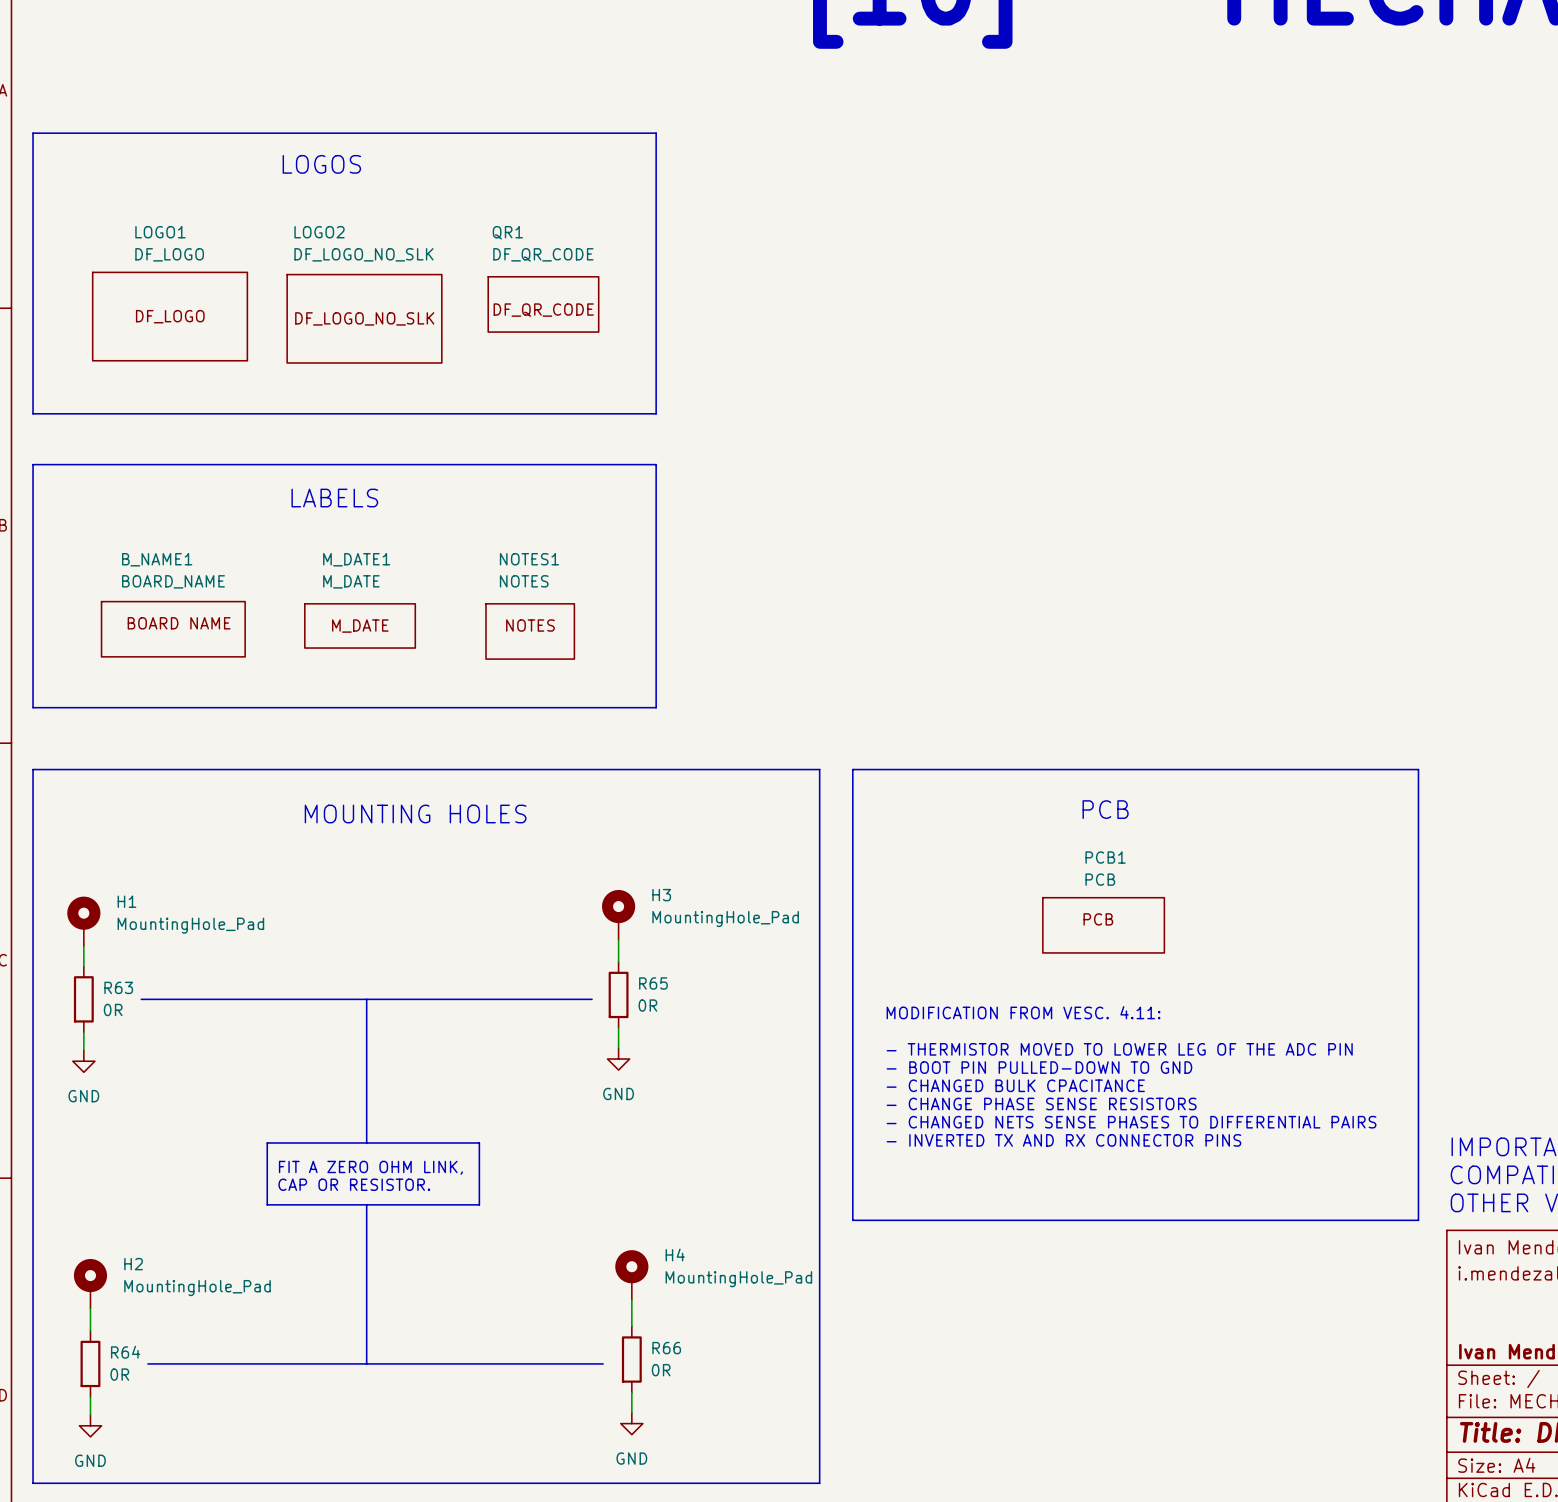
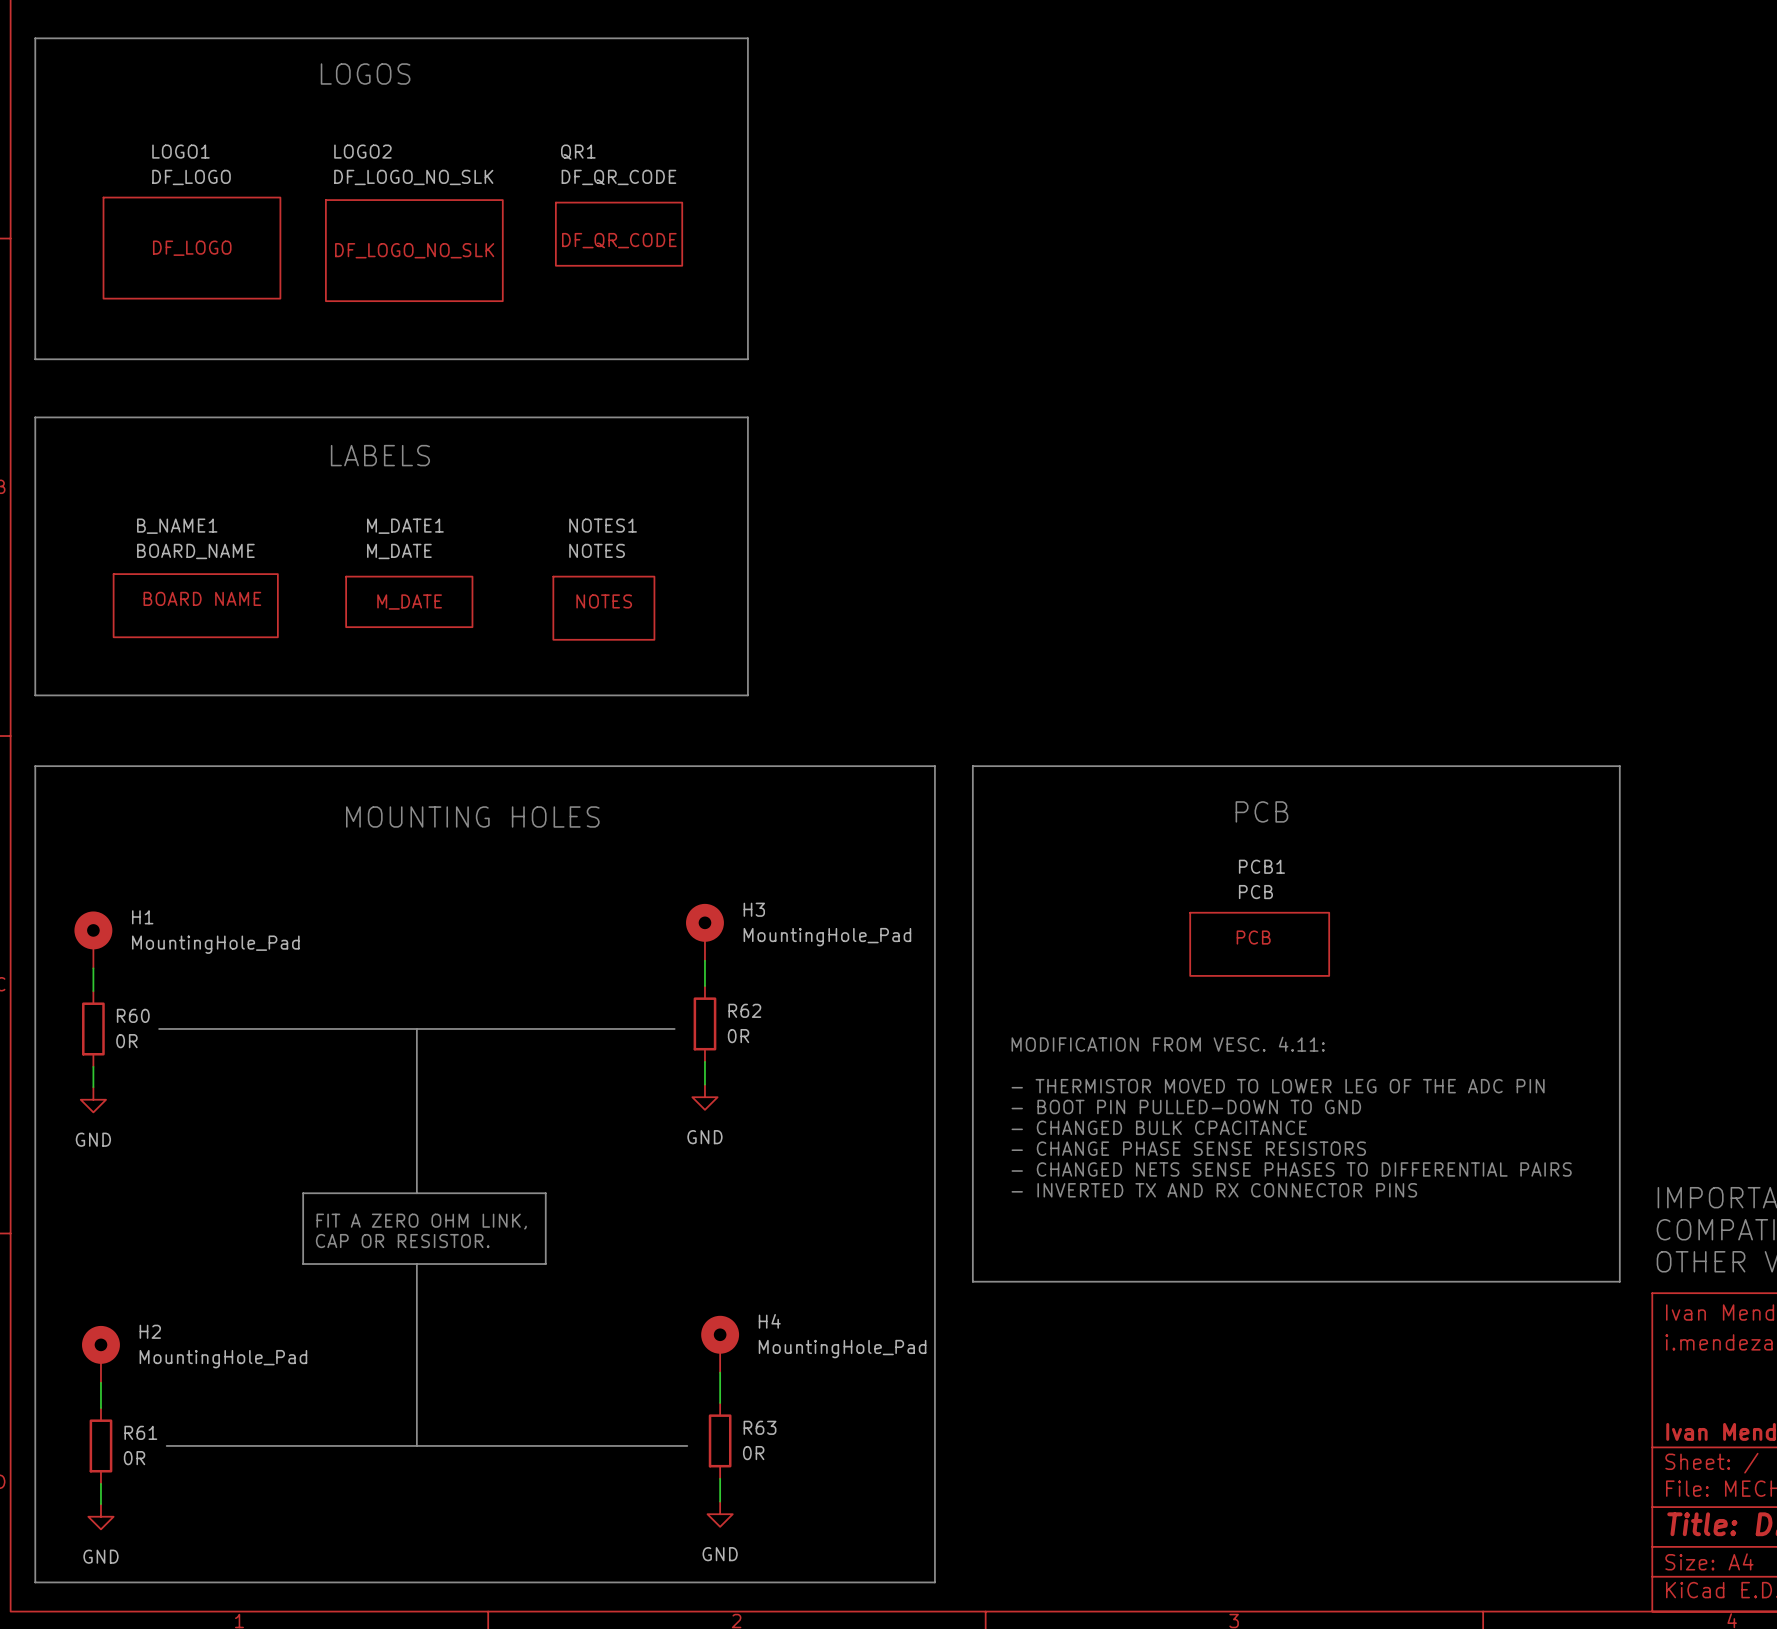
R65 name: R65 (653, 983) -> R62 (744, 1010)
R63 name: R63 (118, 987) -> R60 (133, 1015)
R66 name: R66 (666, 1348) -> R63 (760, 1427)
R64 name: R64 (125, 1352) -> R61 (140, 1432)

